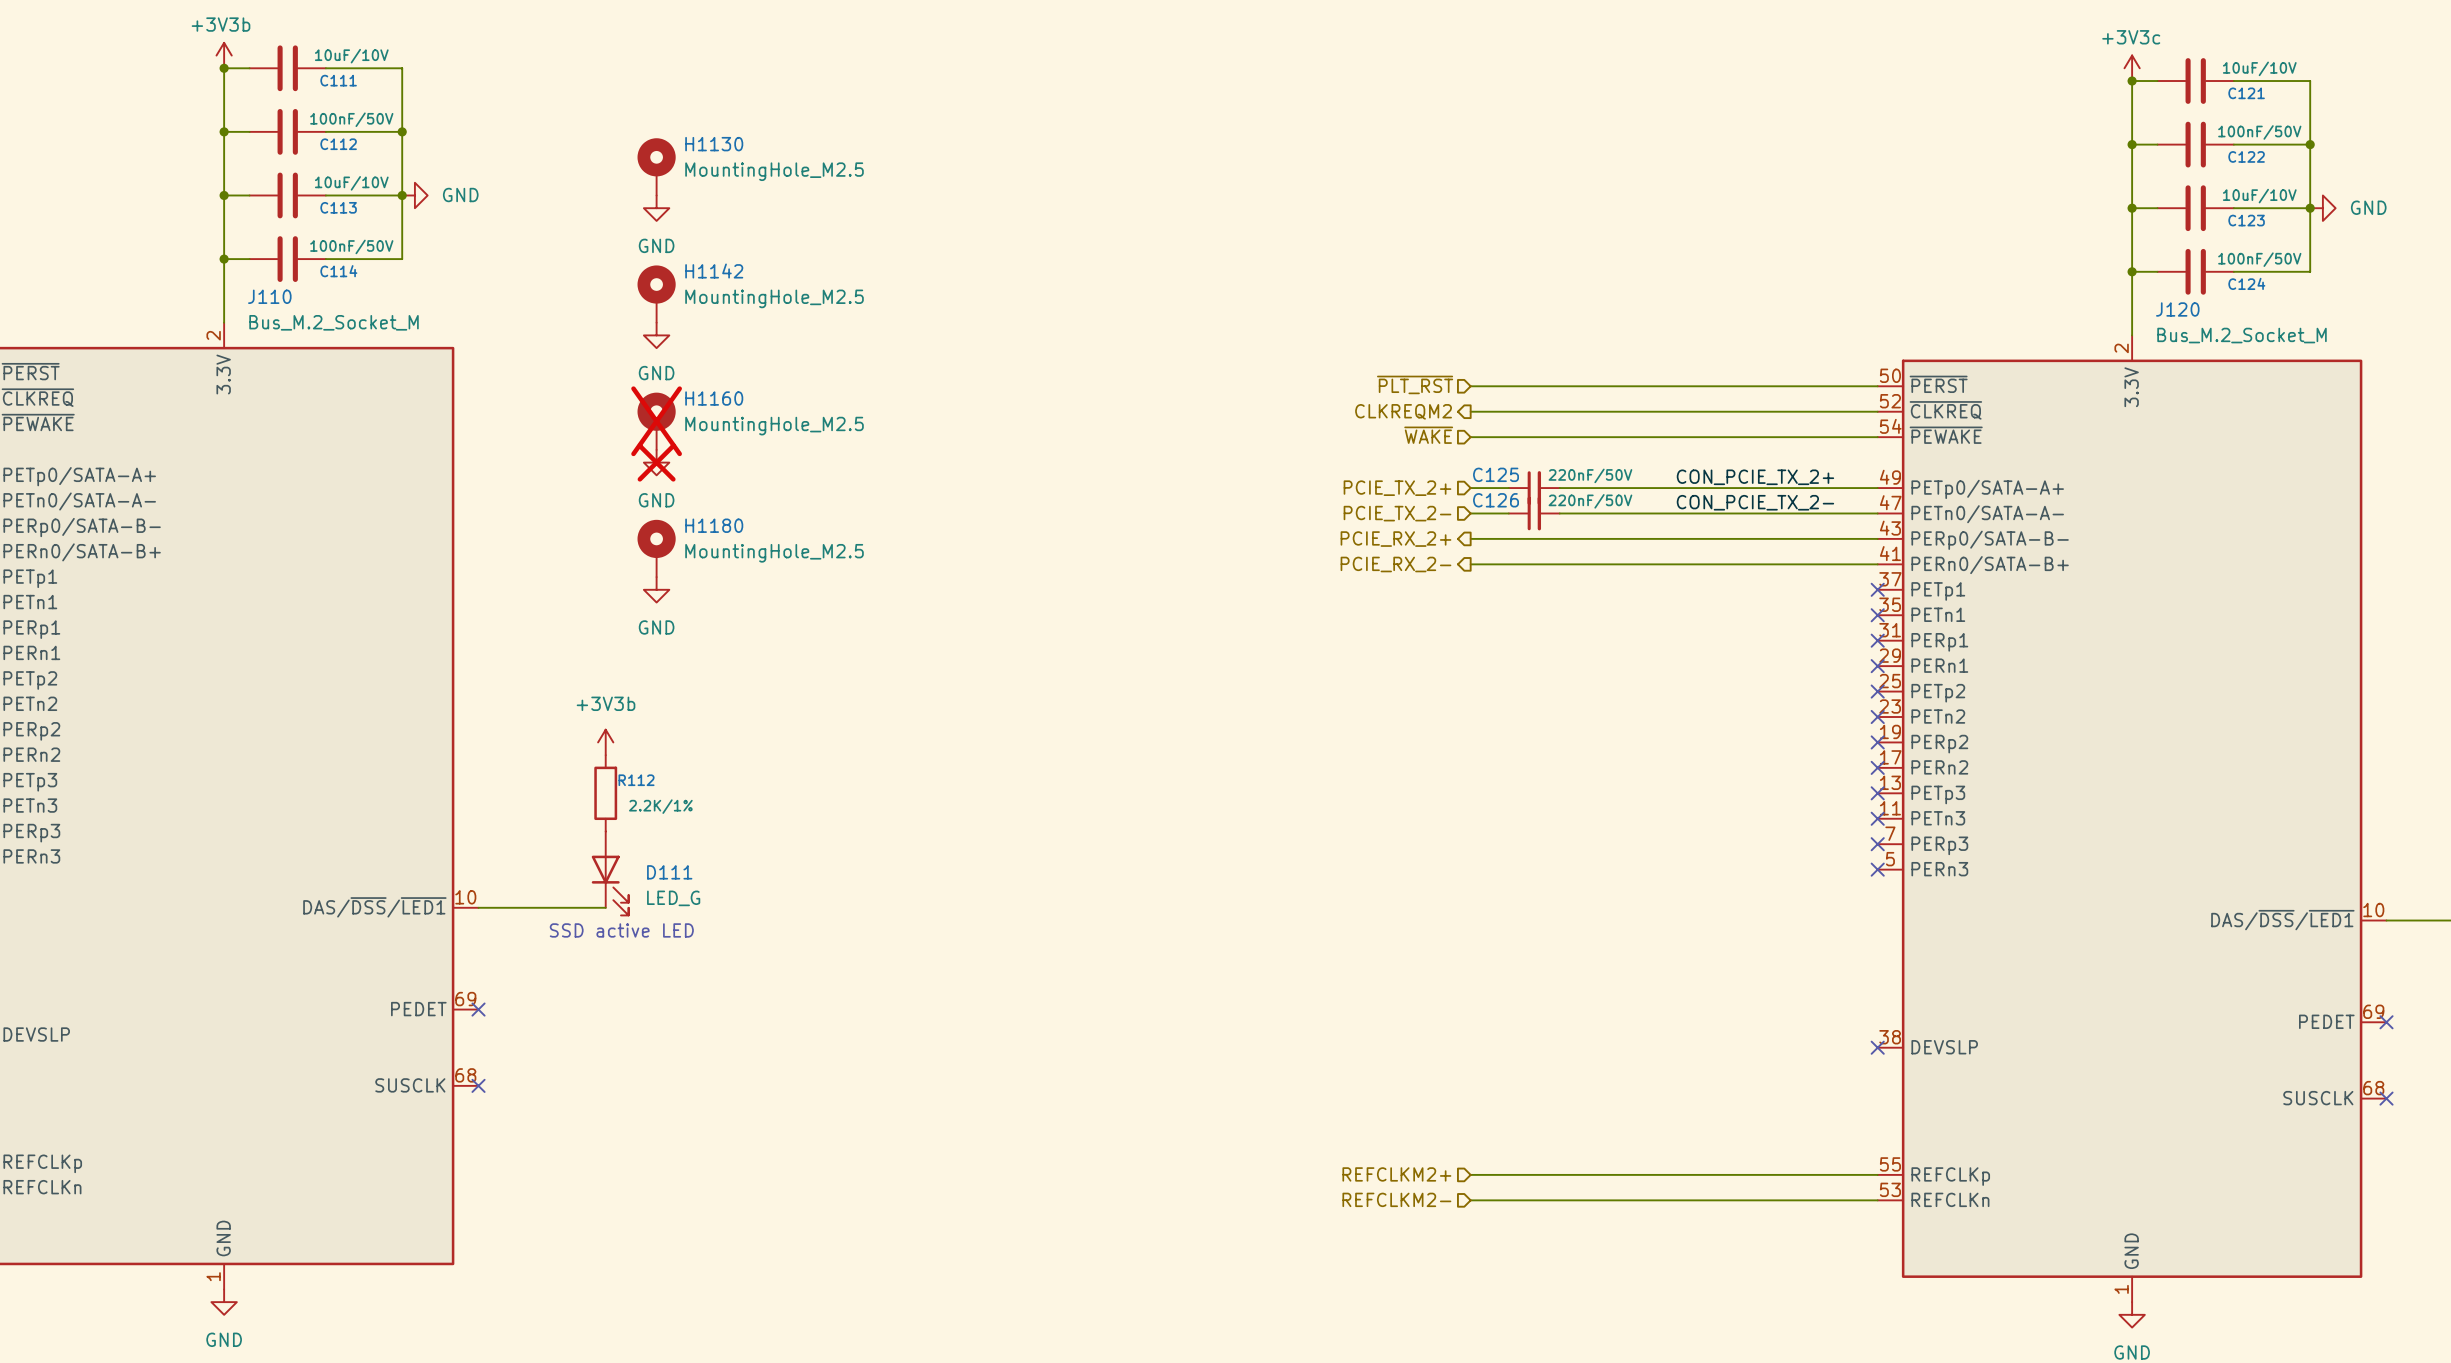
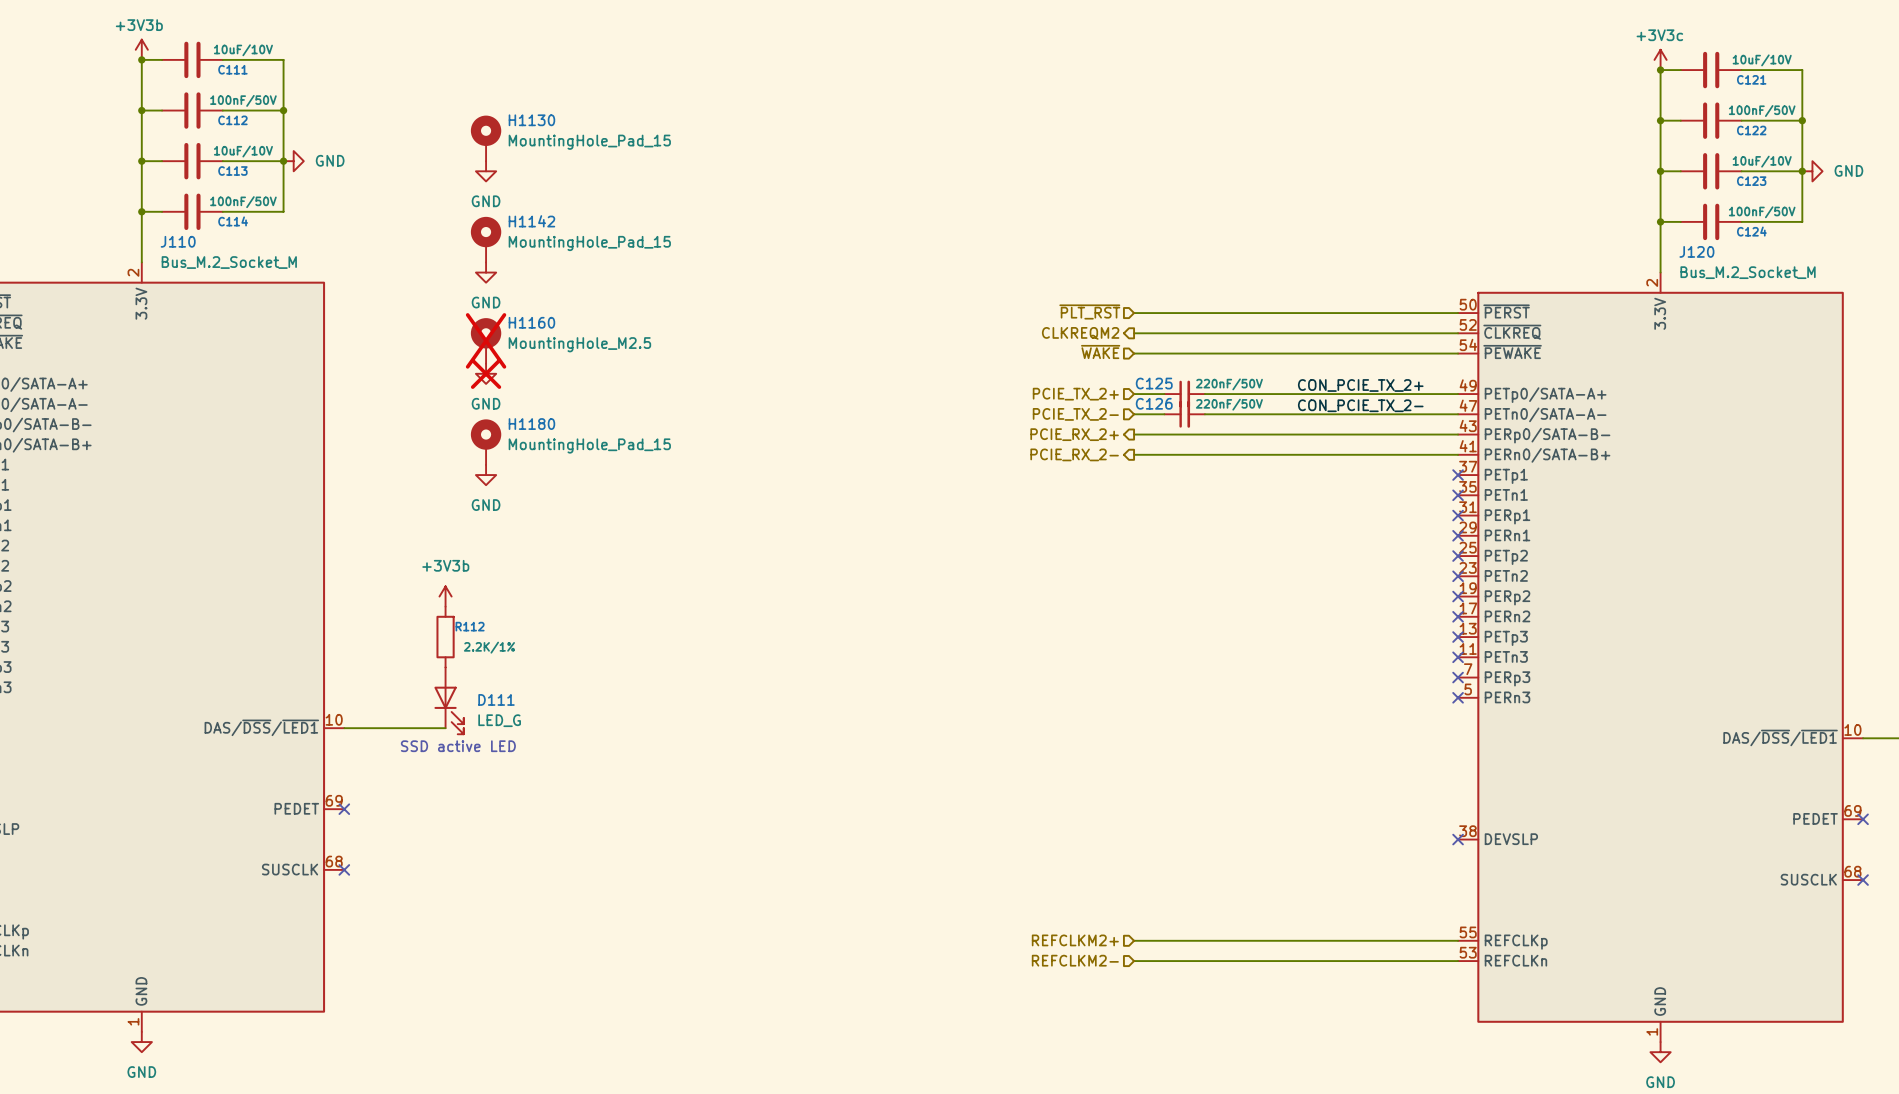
H1130 value: MountingHole_M2.5 (774, 171) -> MountingHole_Pad_15 (589, 142)
H1142 value: MountingHole_M2.5 (774, 298) -> MountingHole_Pad_15 (589, 243)
H1180 value: MountingHole_M2.5 (774, 553) -> MountingHole_Pad_15 (589, 445)

